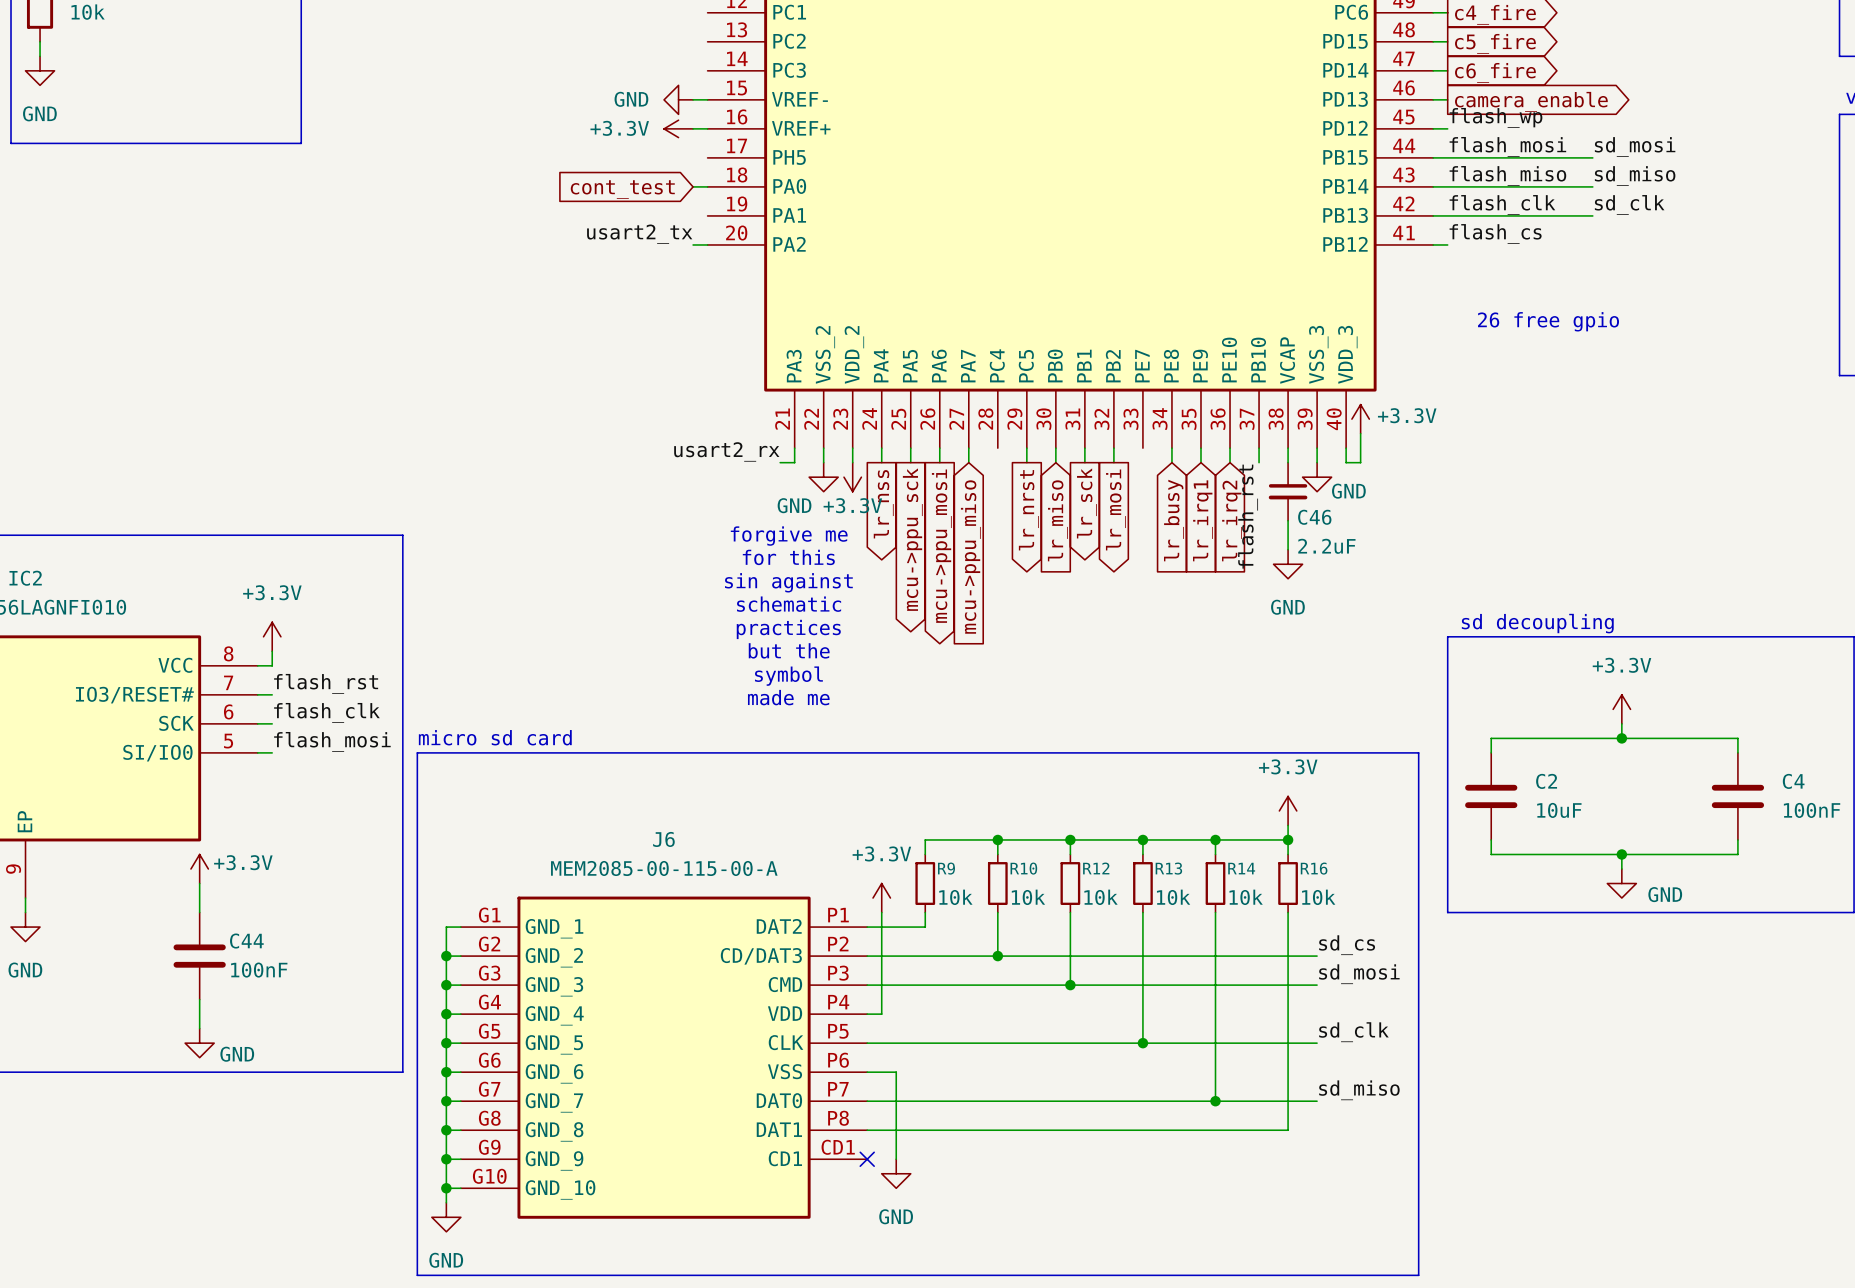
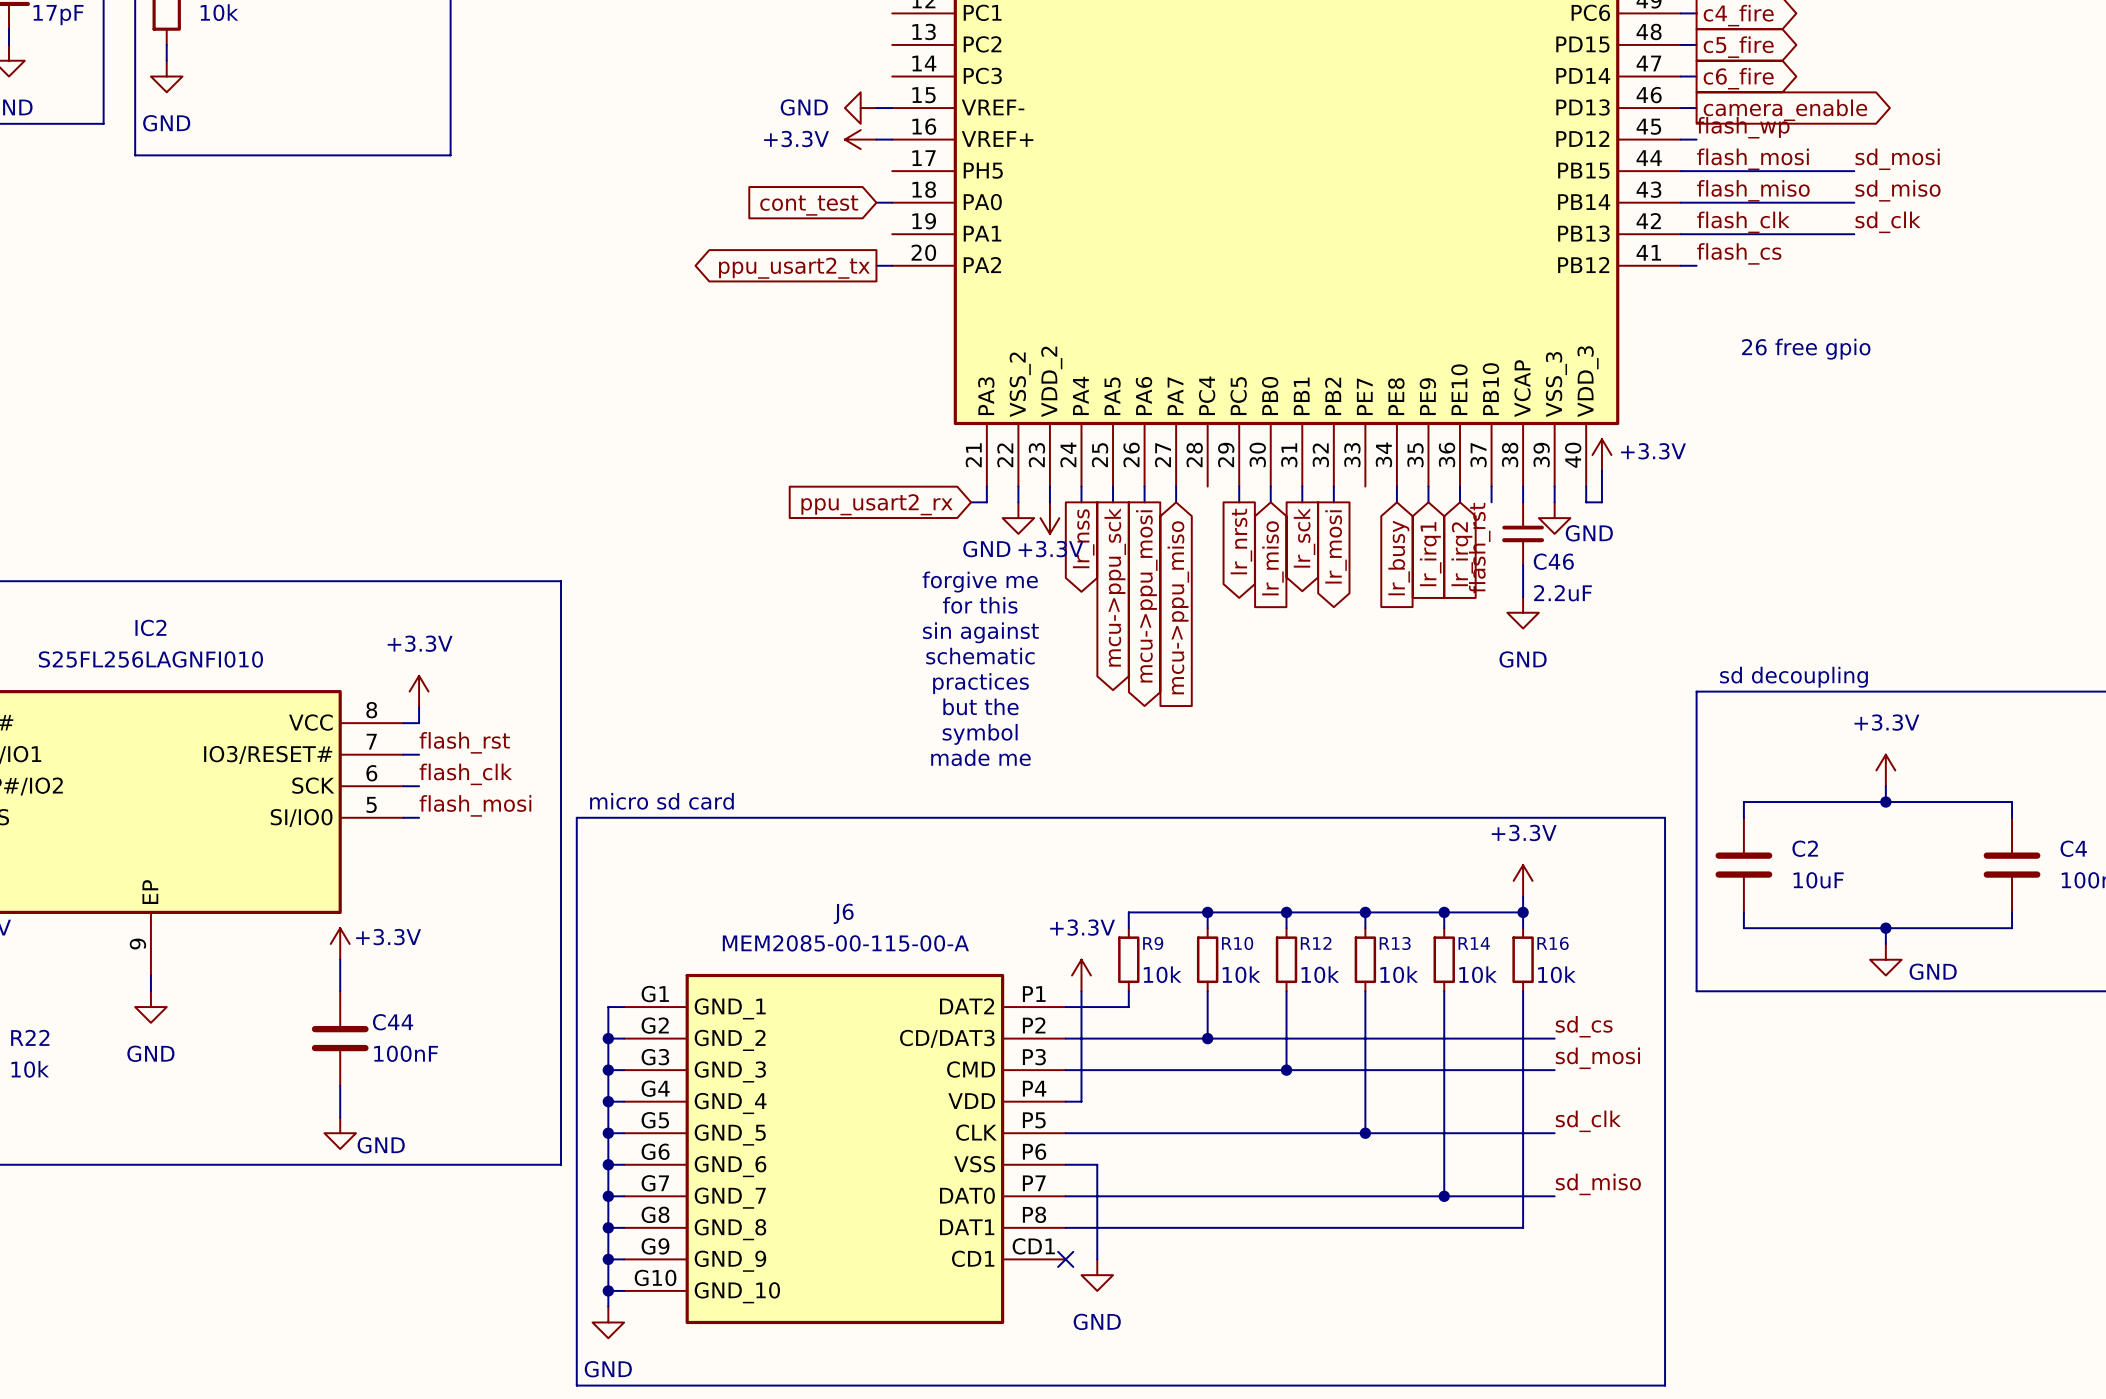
label: usart2_tx (639, 234) -> none
global label: none -> ppu_usart2_tx (794, 268)
label: usart2_rx (726, 451) -> none
global label: none -> ppu_usart2_rx (877, 504)

